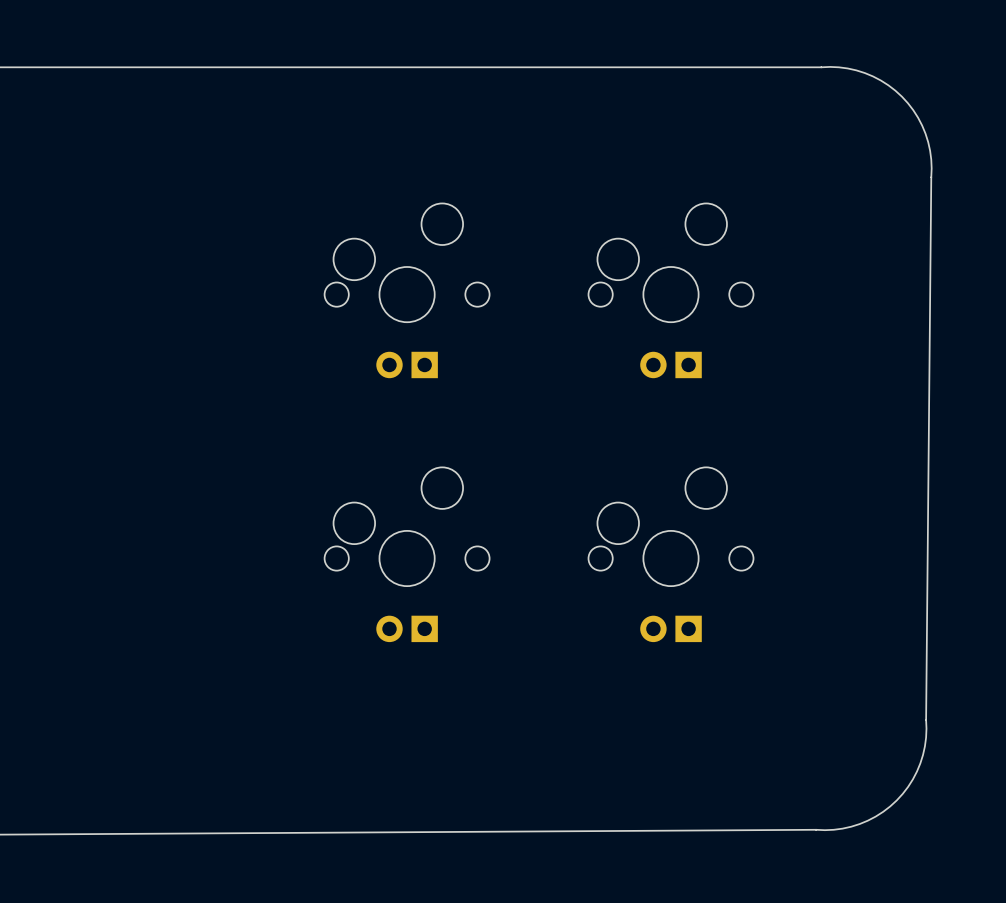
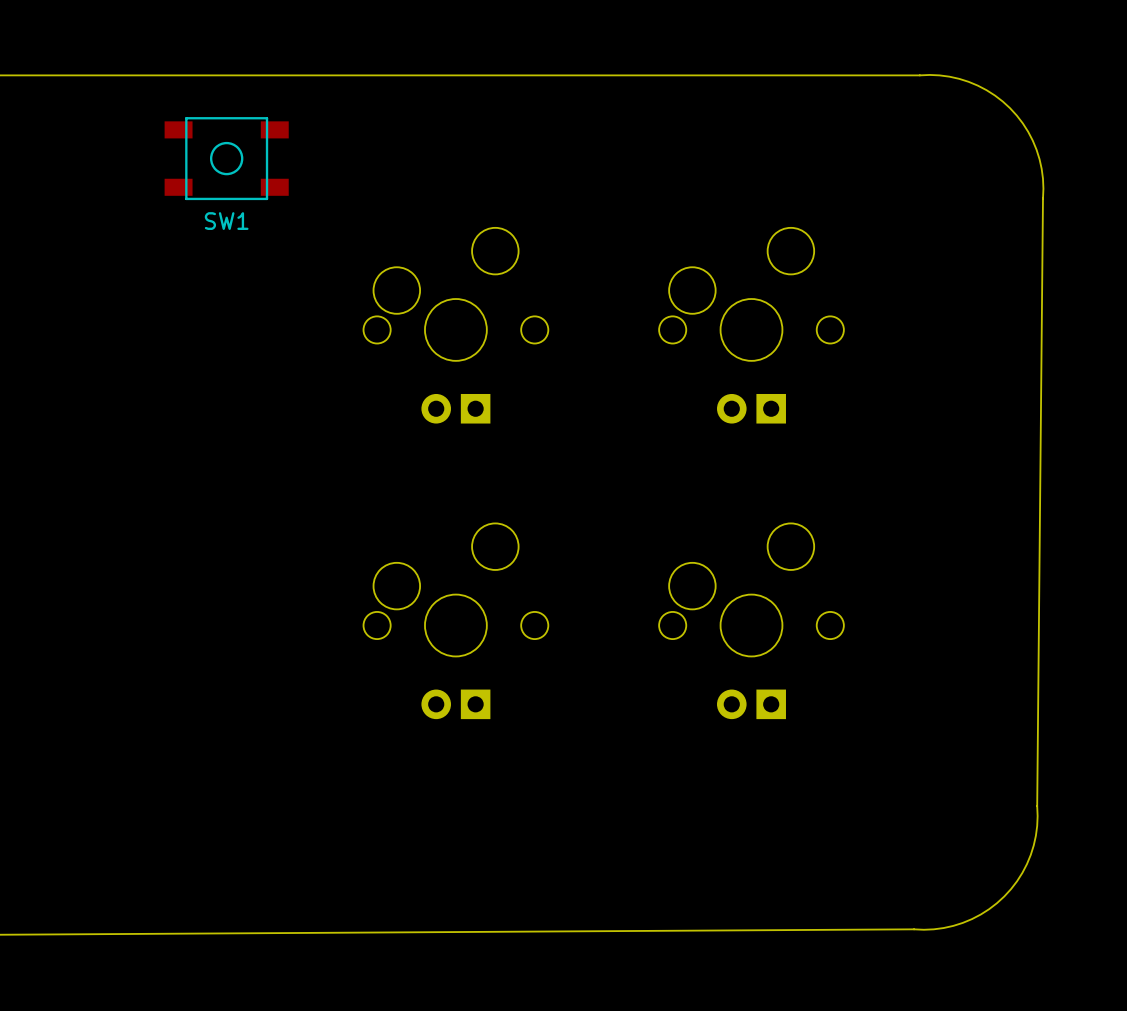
SW1: none -> (226, 158)

